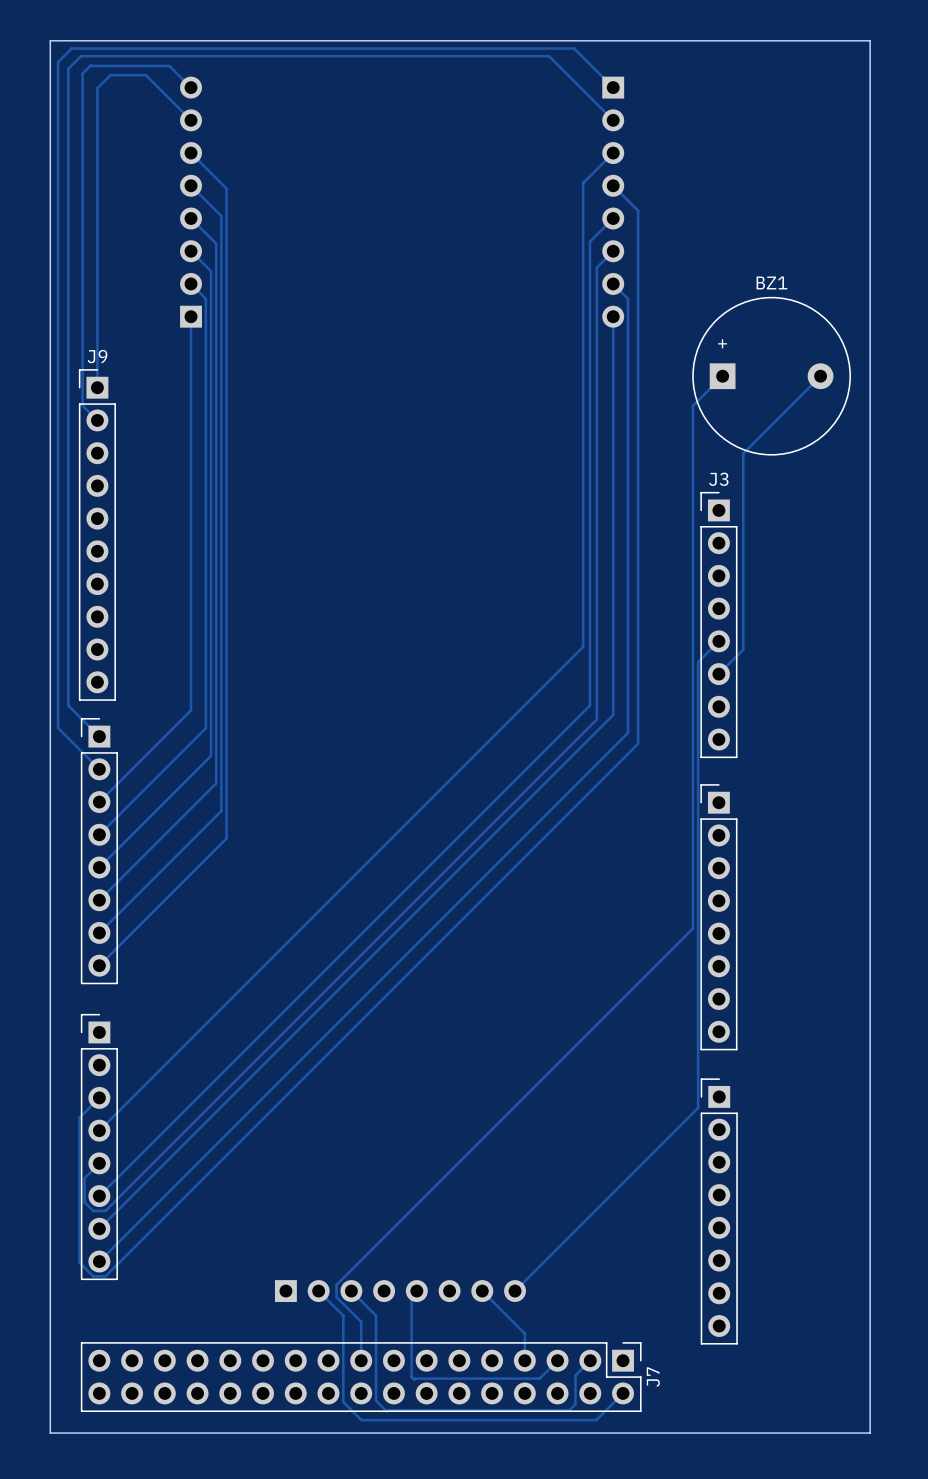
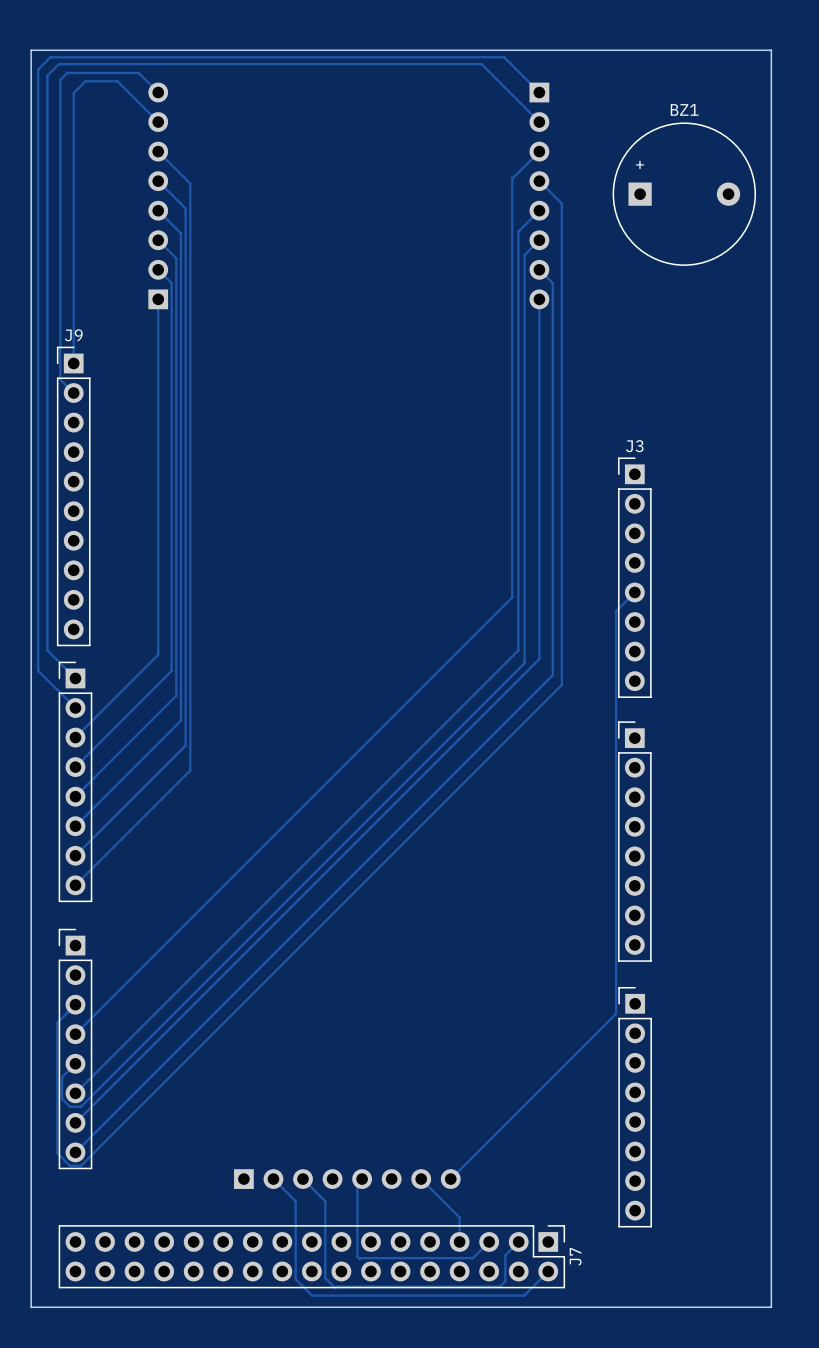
track: (722, 376) (692, 405) (692, 928) (336, 1284) (336, 1297) (361, 1321) (361, 1360) -> none
BZ1 position: (771, 376) -> (684, 194)
track: (820, 376) (743, 453) (743, 649) (718, 674) -> none

